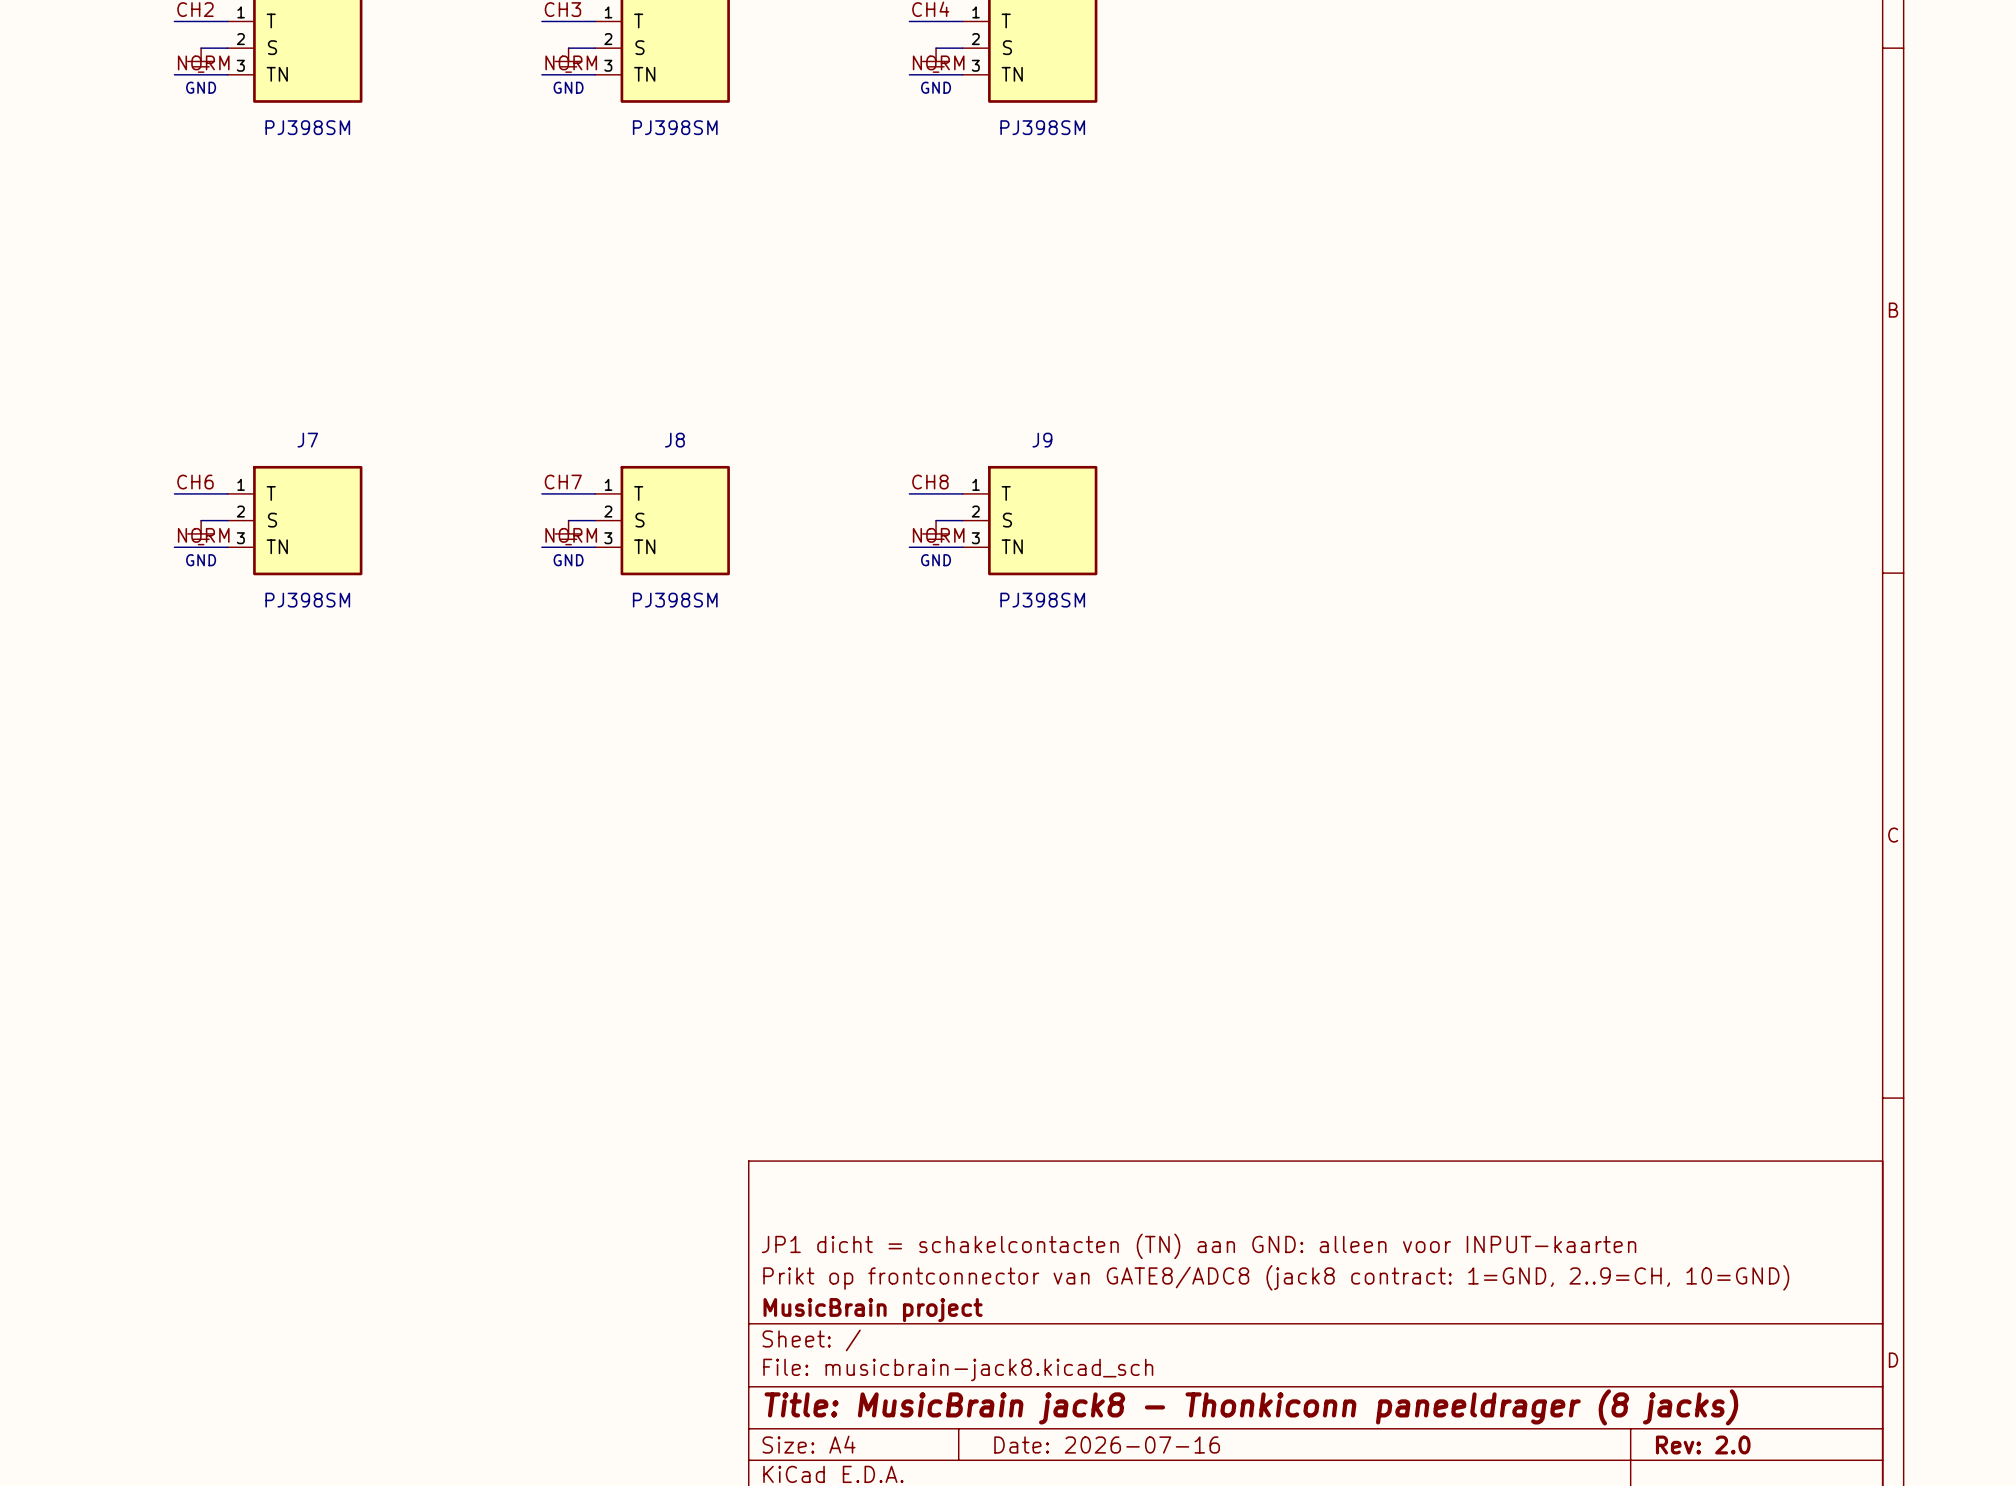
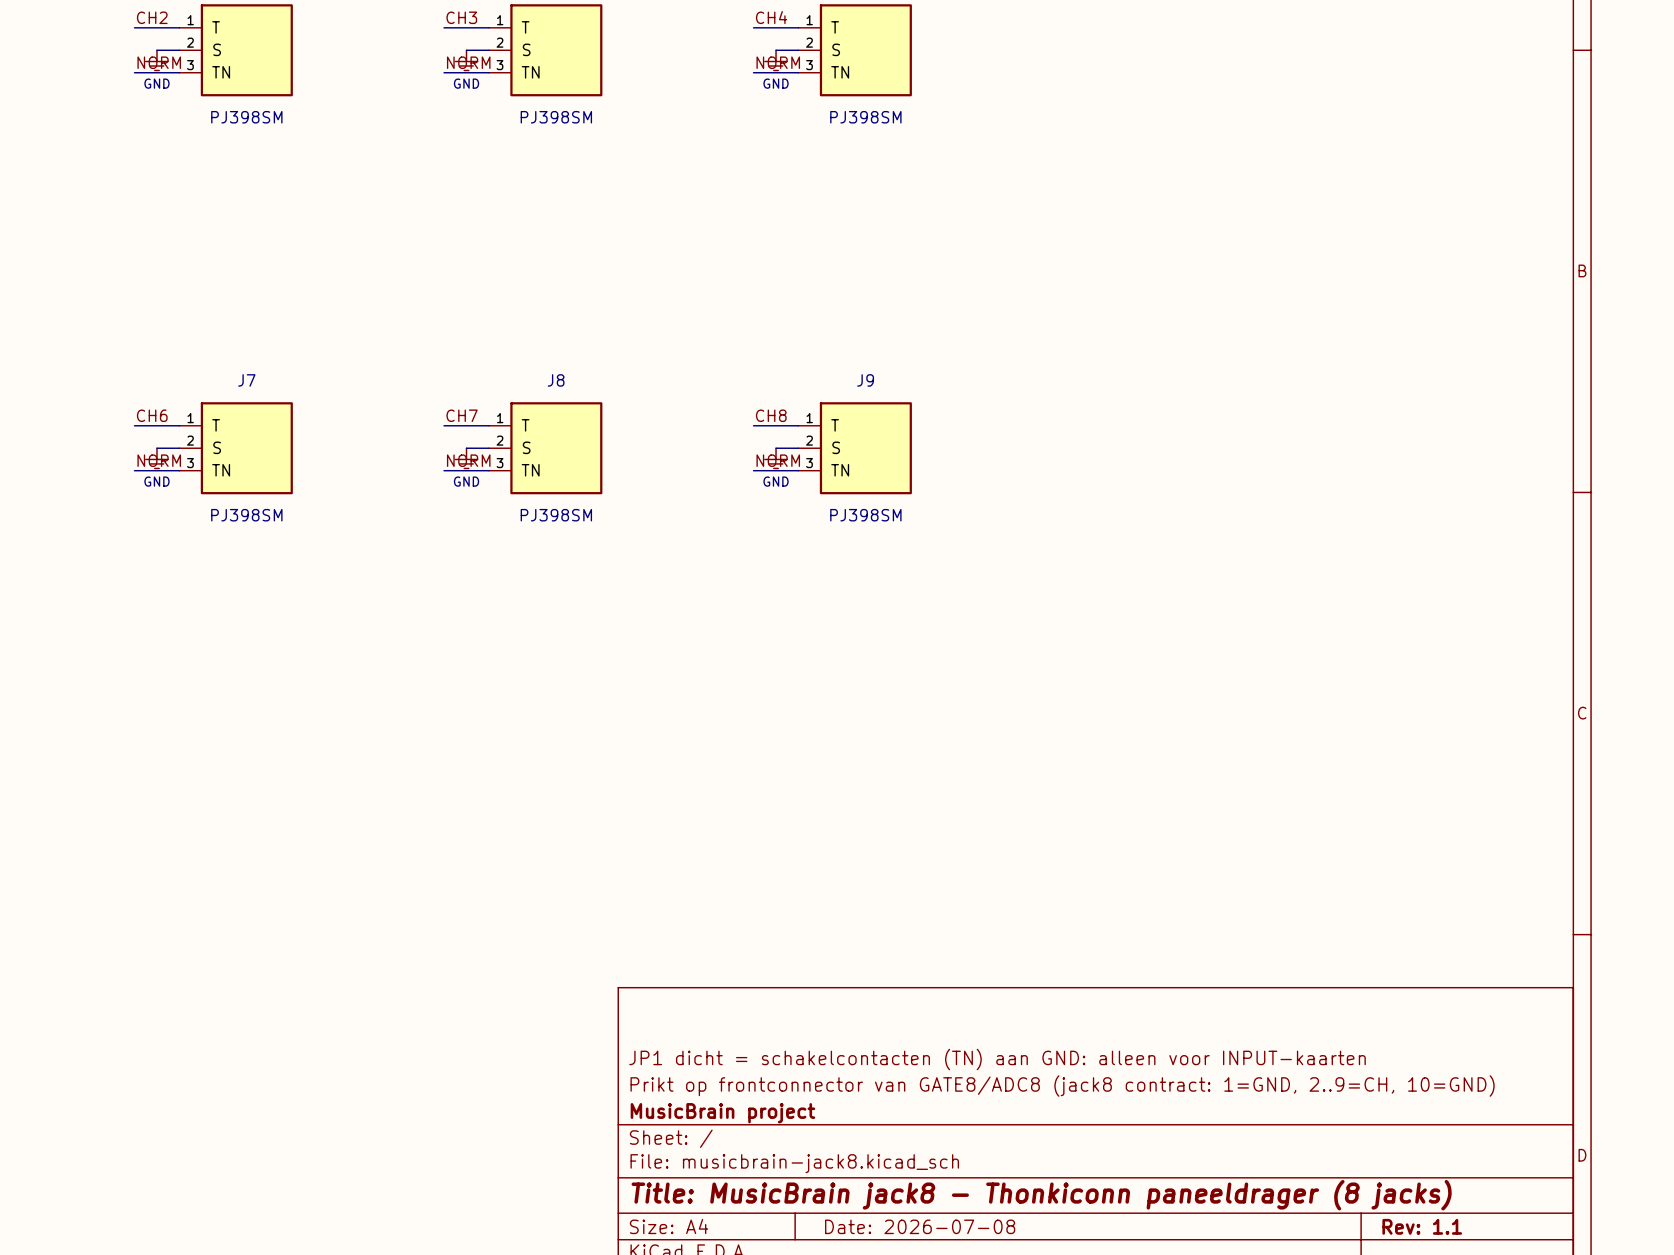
title block: Date: 2026-07-16 (1107, 1445) -> Date: 2026-07-08 (920, 1226)
title block: Rev: 2.0 (1703, 1445) -> Rev: 1.1 (1422, 1226)

